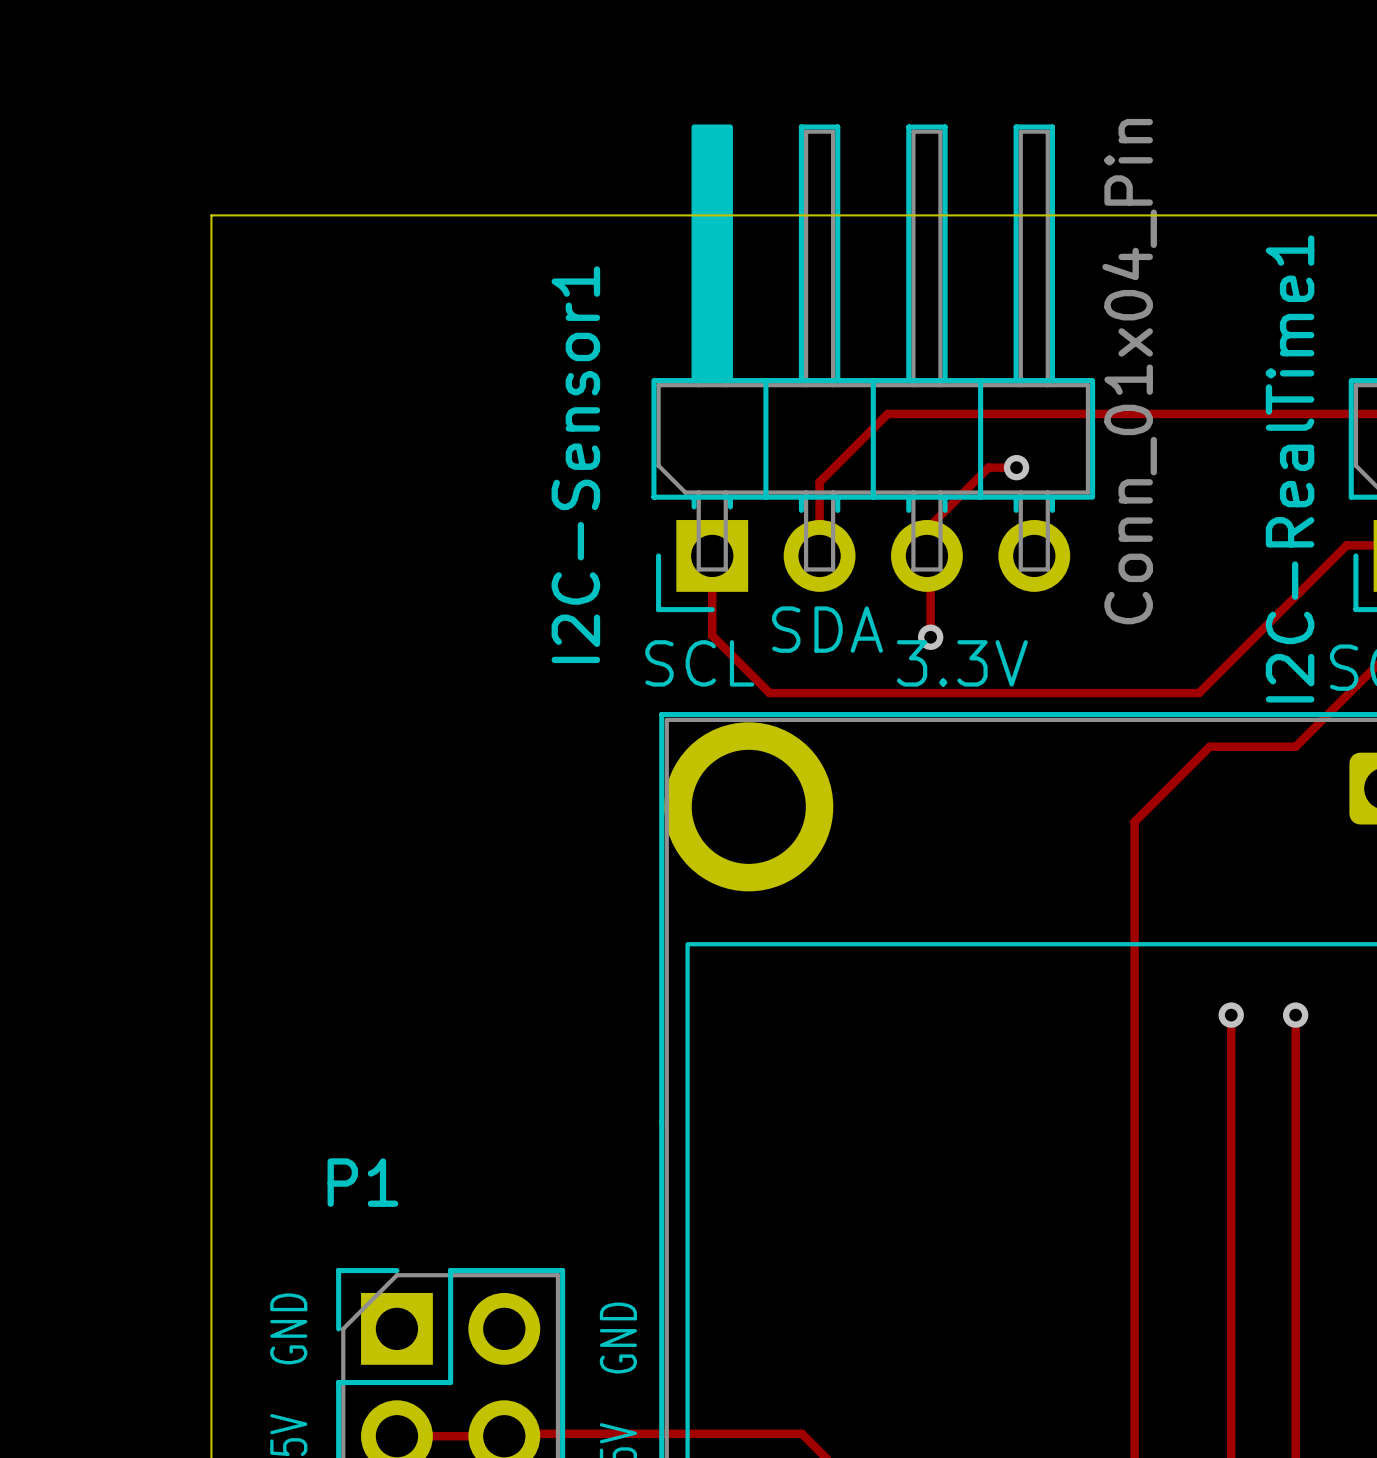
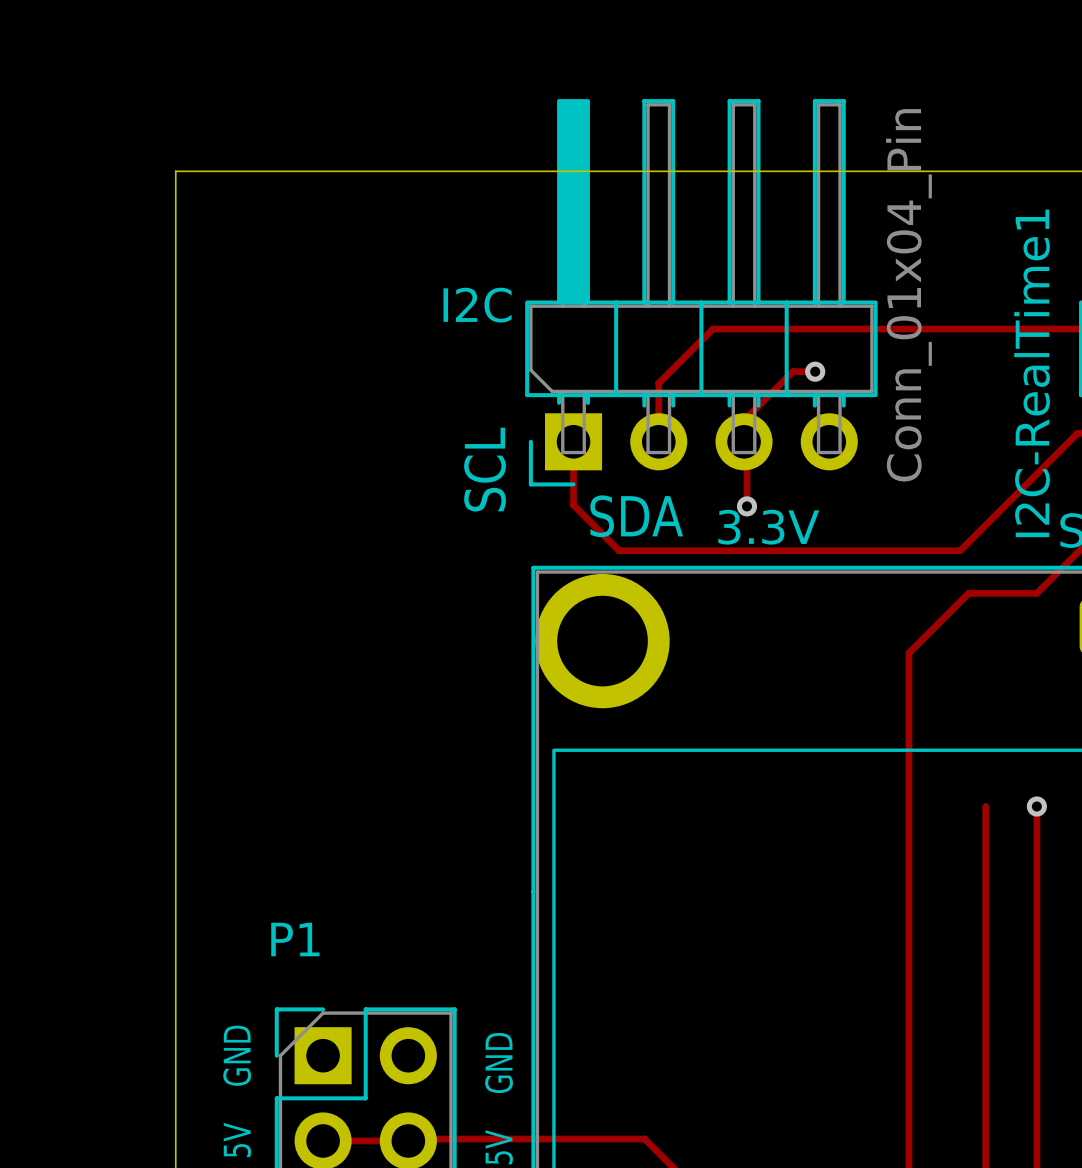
I2C-Sensor1 name: I2C-Sensor1 (575, 464) -> I2C (477, 305)
text position: SDA (827, 629) -> SDA (636, 516)
text rotation: 0° (699, 663) -> 90° counterclockwise (485, 469)
via: (1231, 1015) -> none

